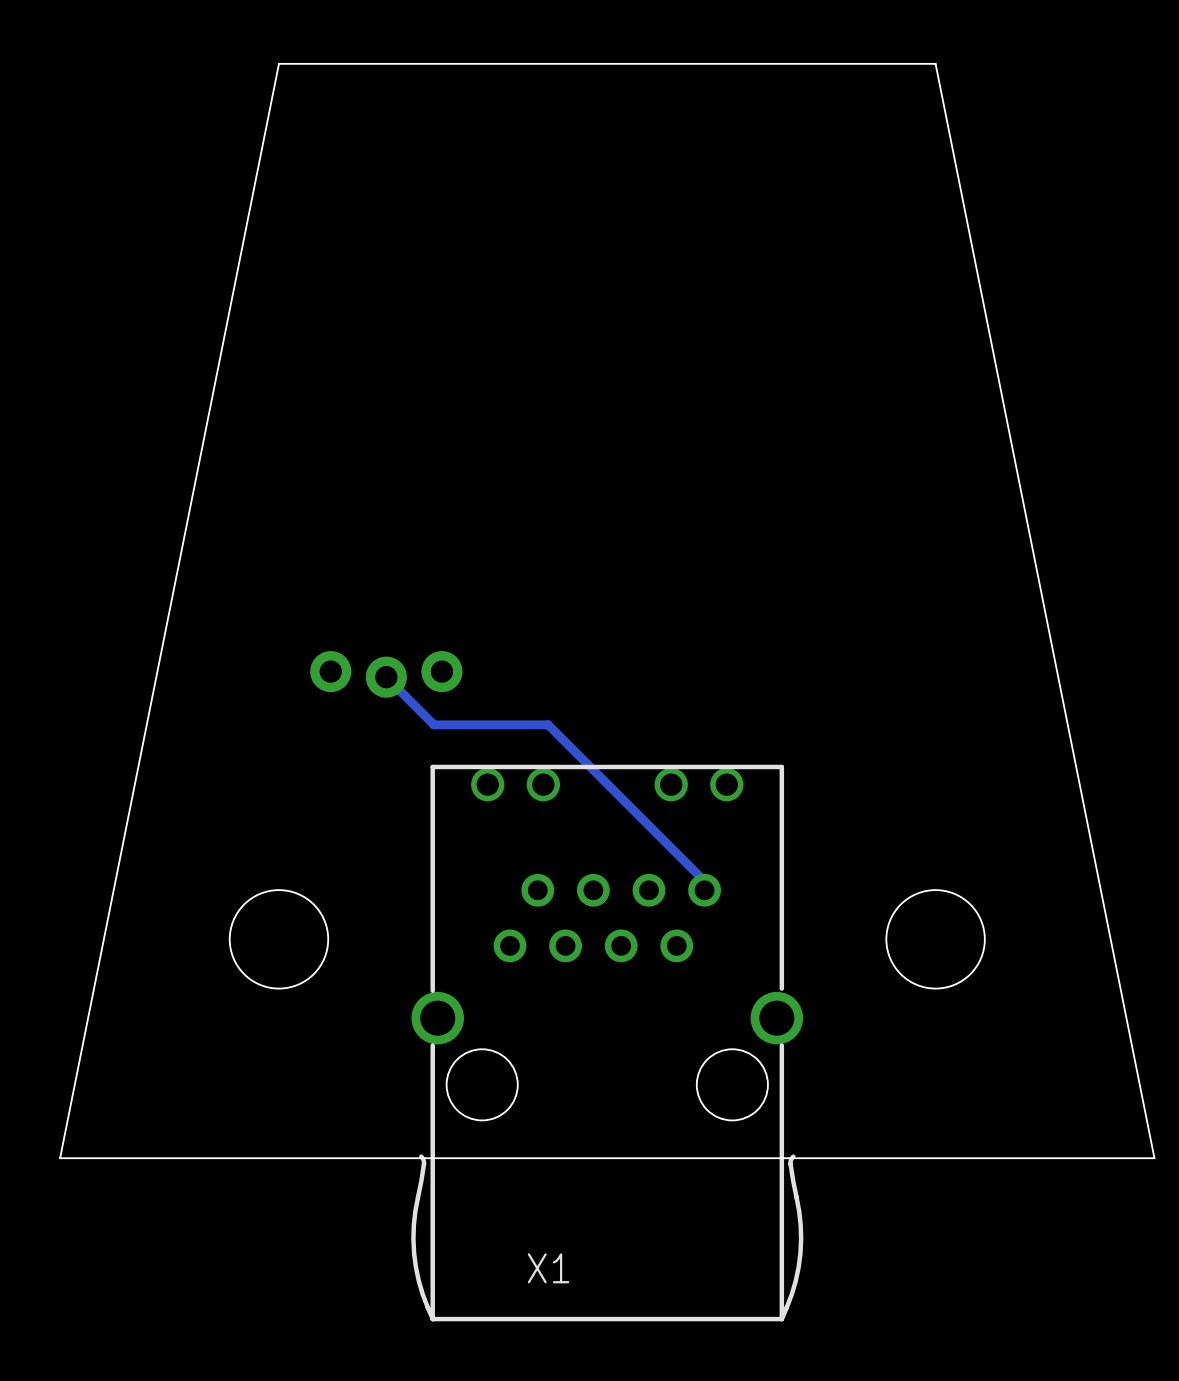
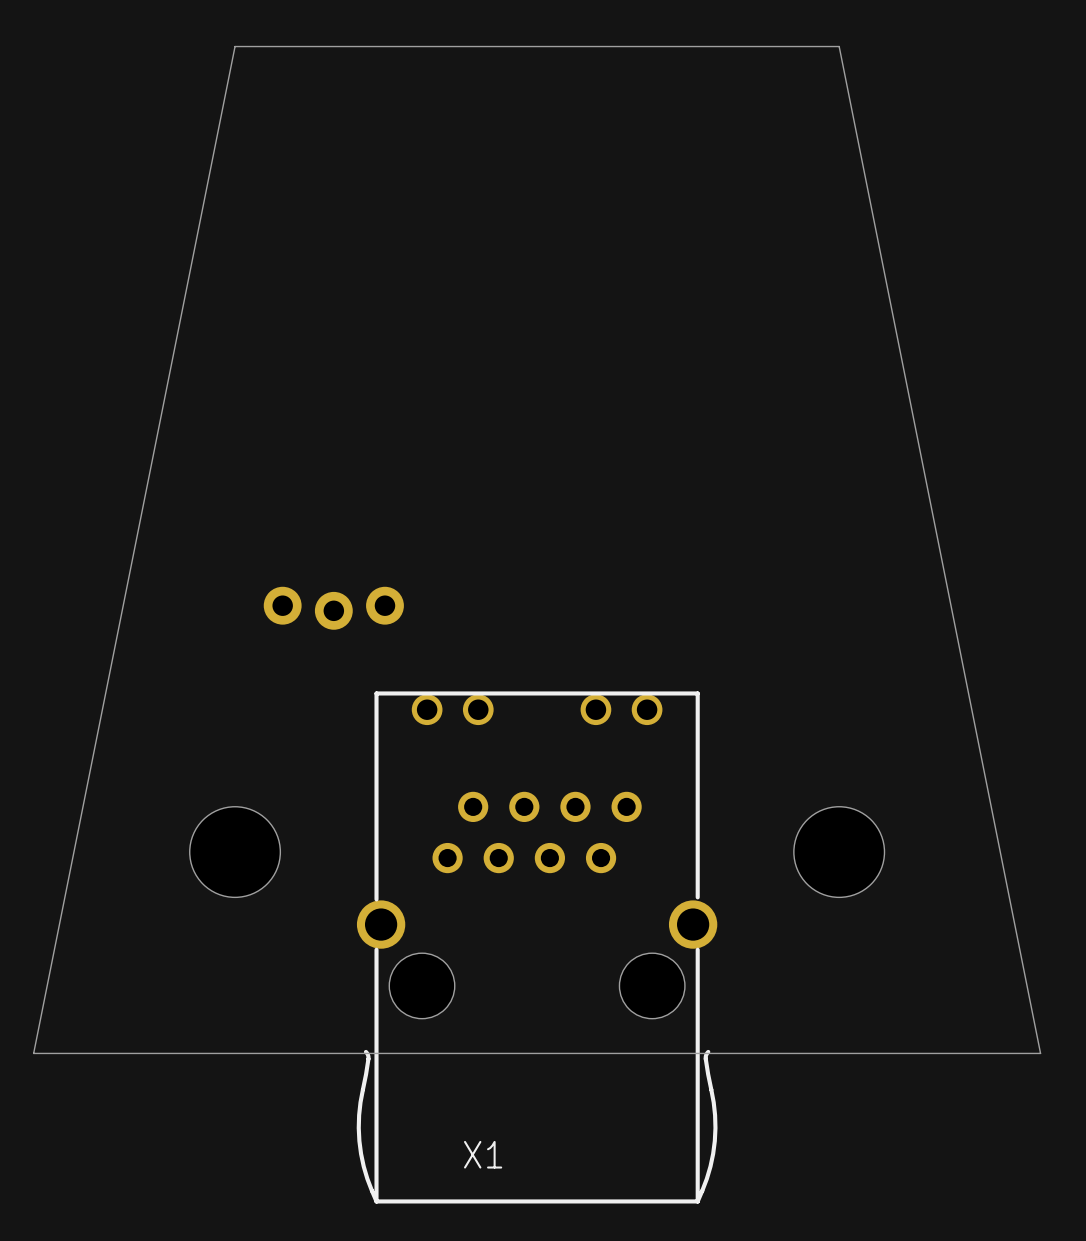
track: (386, 677) (434, 724) (548, 724) (704, 881) (704, 890) -> none

